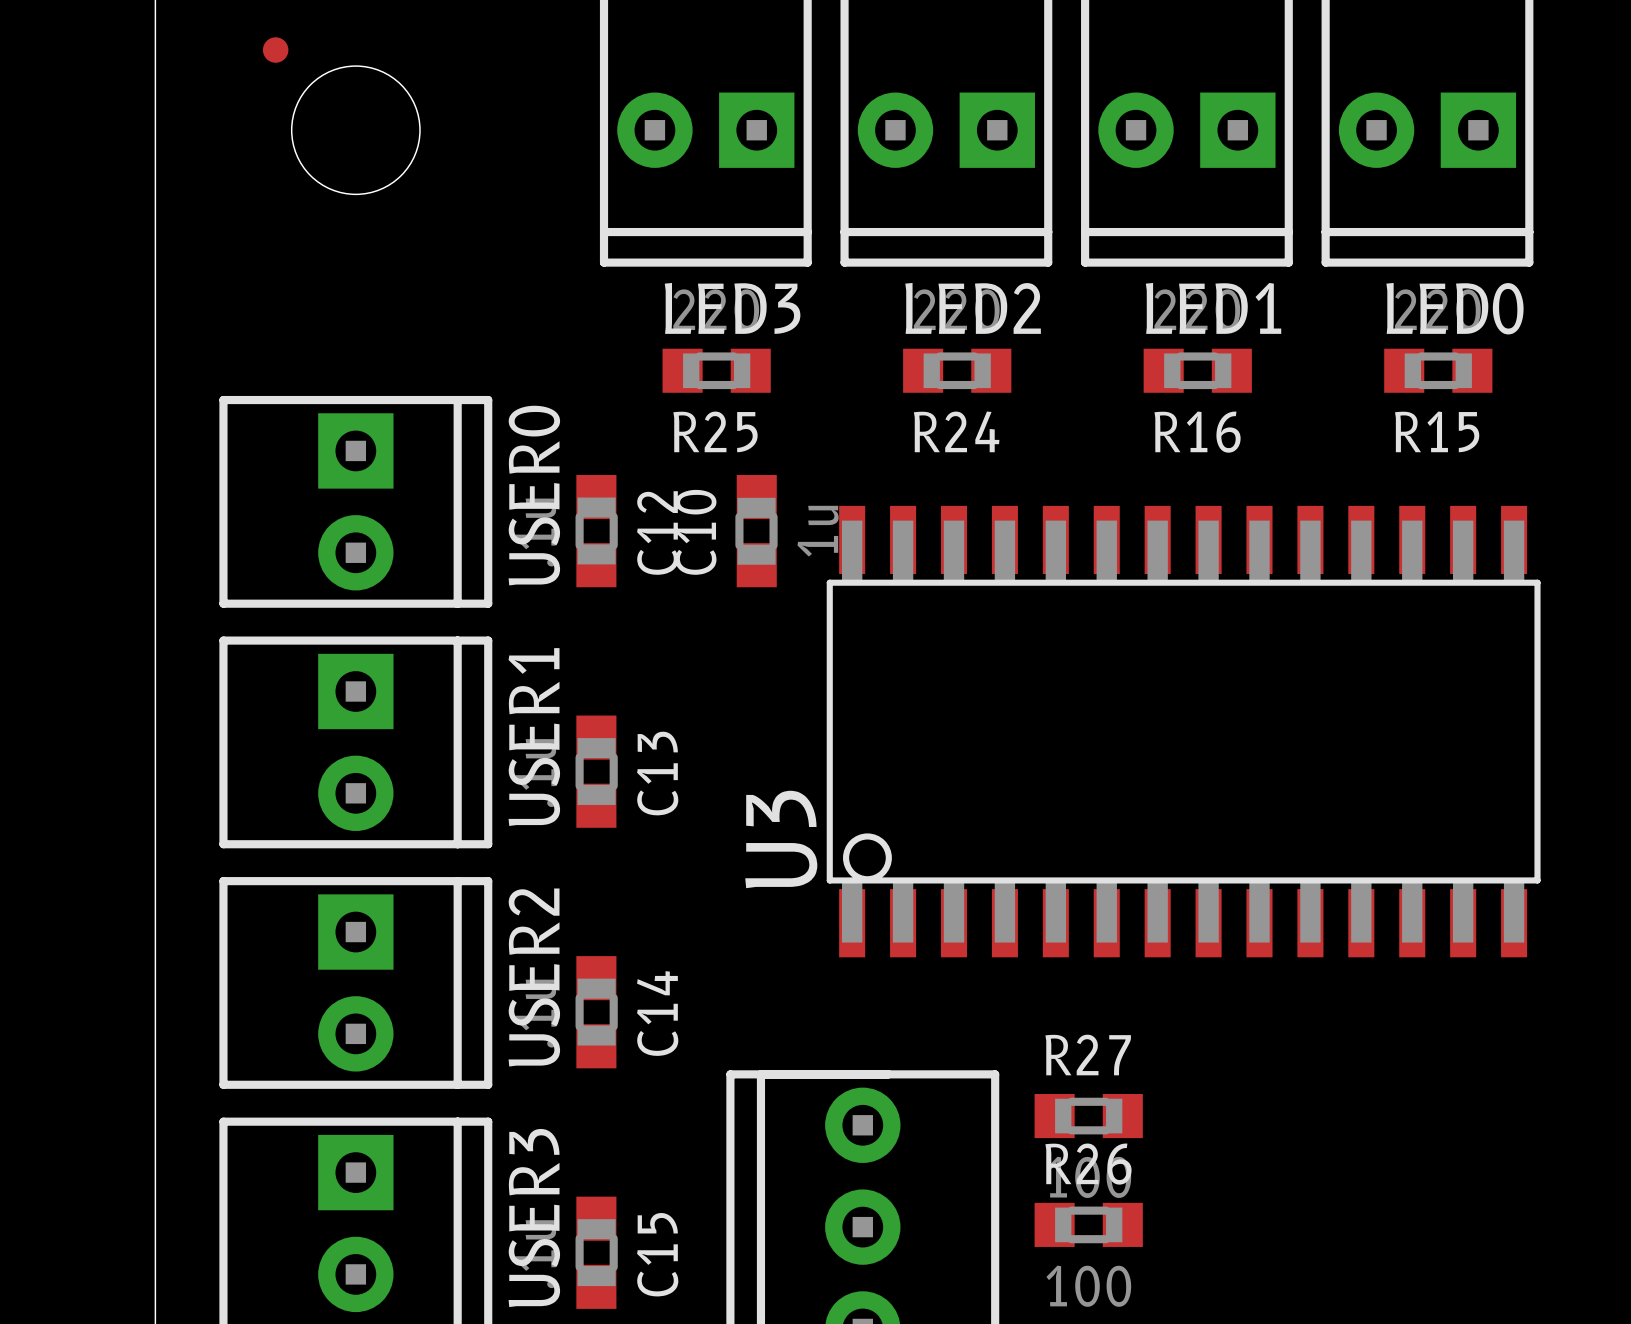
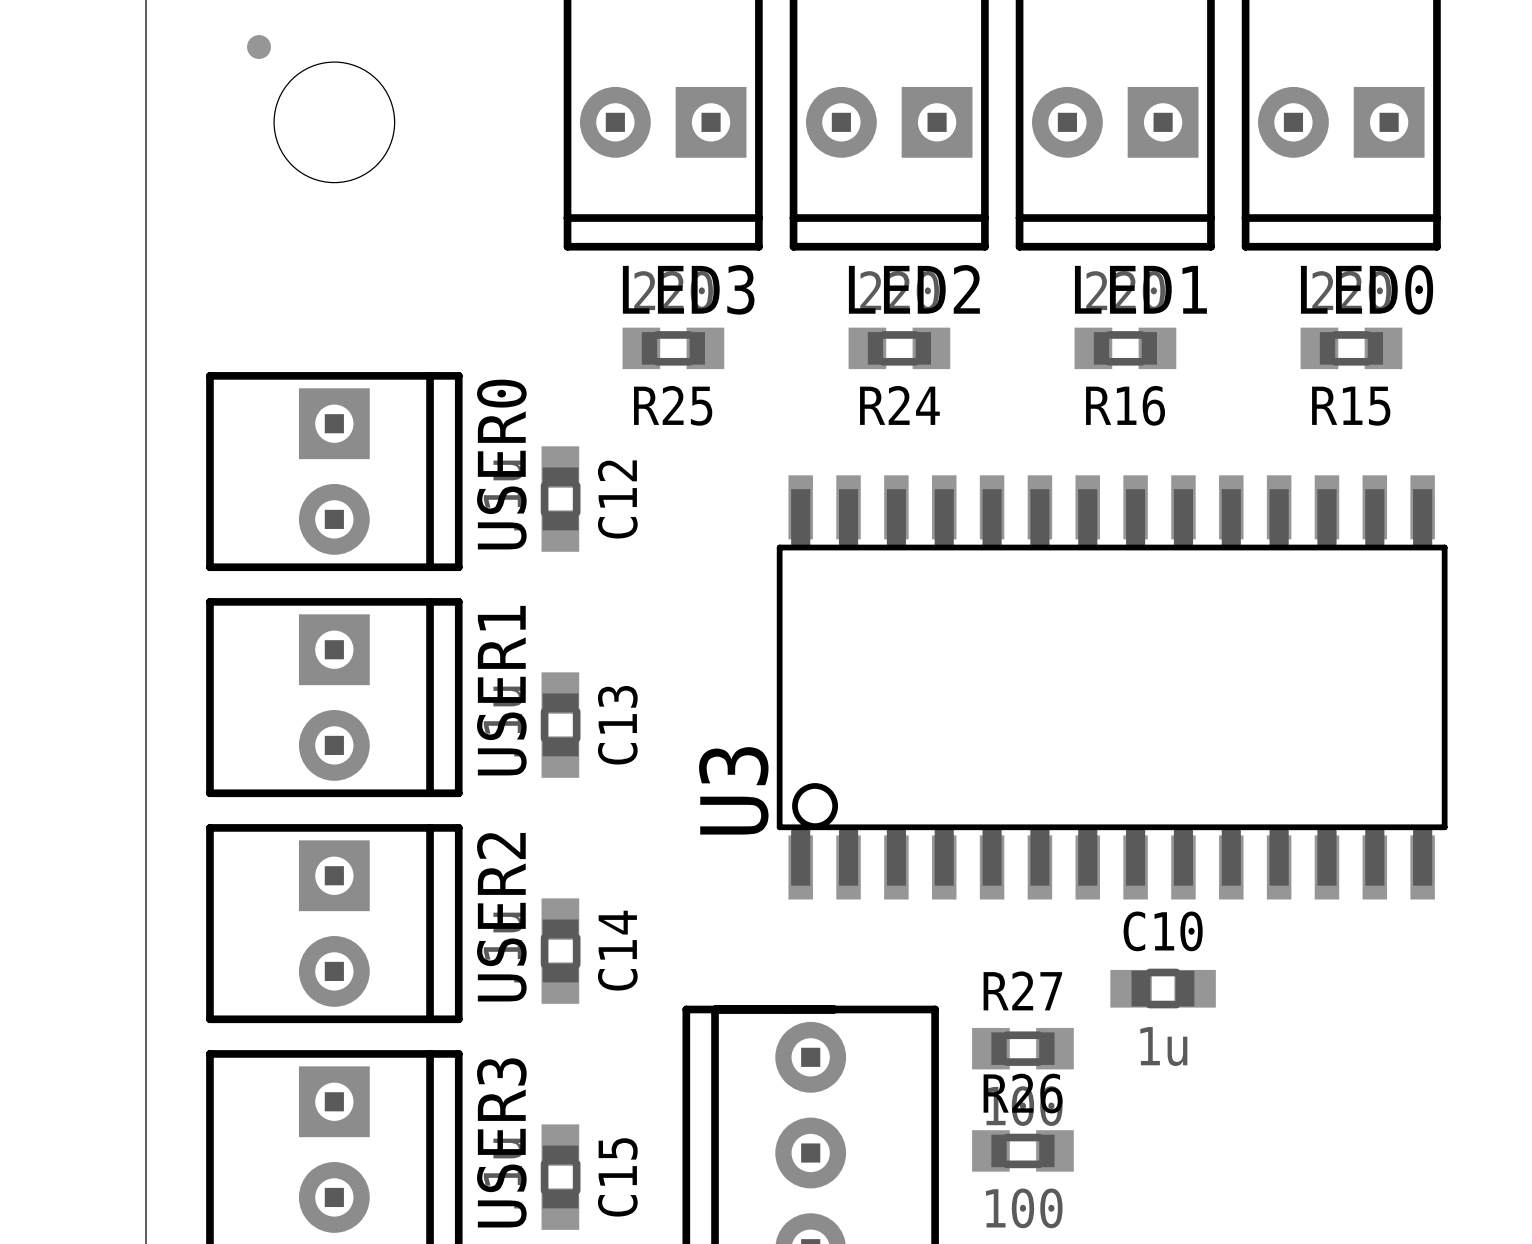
C10 rotation: 0° (756, 531) -> 90° clockwise (1163, 988)
C10 position: (756, 531) -> (1163, 988)

